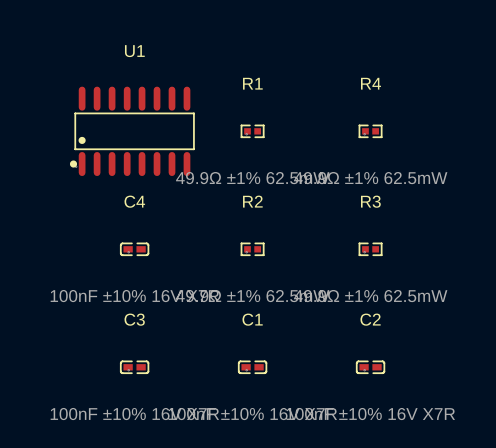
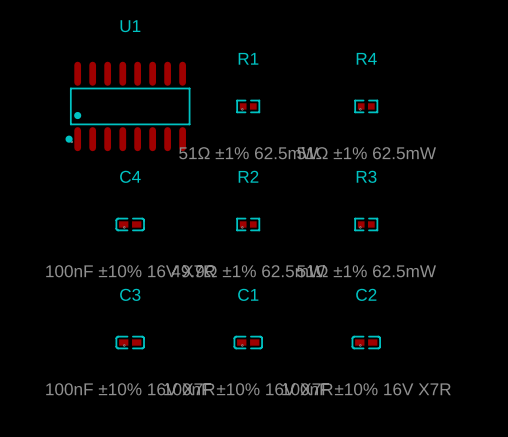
R1 value: 49.9Ω ±1% 62.5mW (252, 178) -> 51Ω ±1% 62.5mW (248, 153)
R4 value: 49.9Ω ±1% 62.5mW (370, 178) -> 51Ω ±1% 62.5mW (366, 153)
R3 value: 49.9Ω ±1% 62.5mW (370, 296) -> 51Ω ±1% 62.5mW (366, 271)

